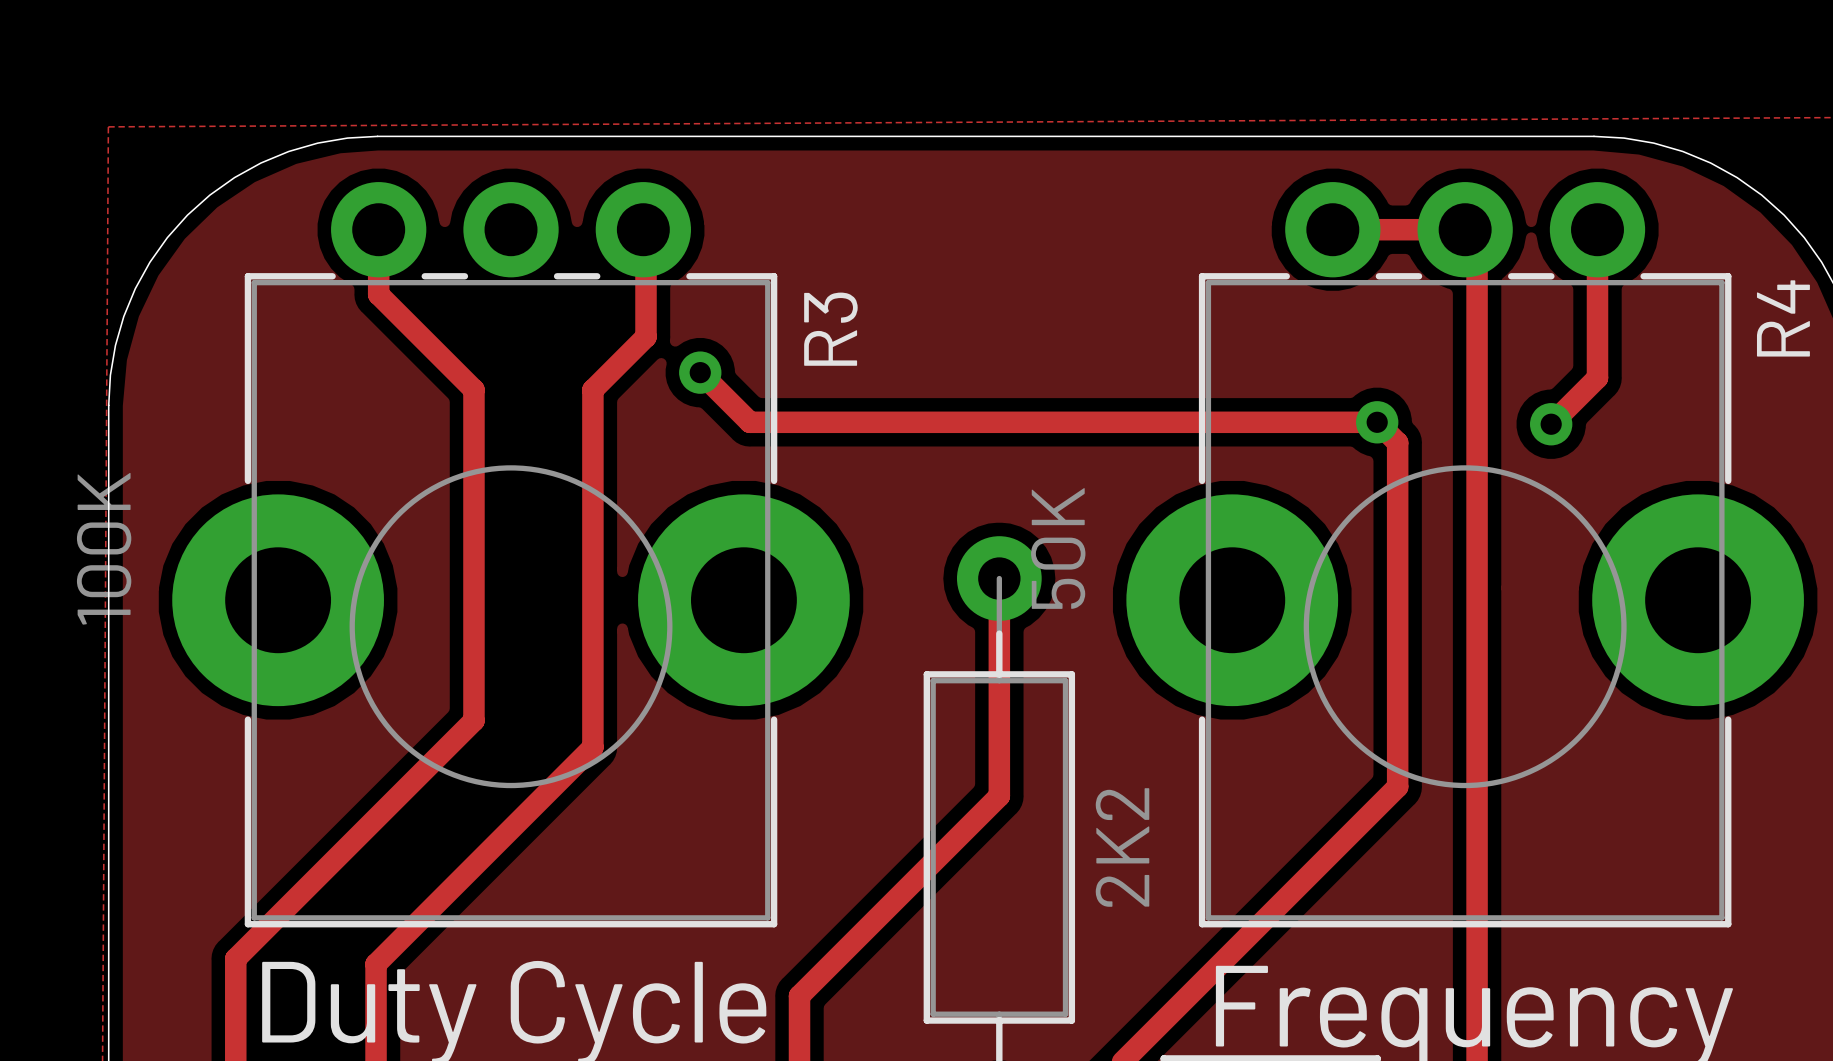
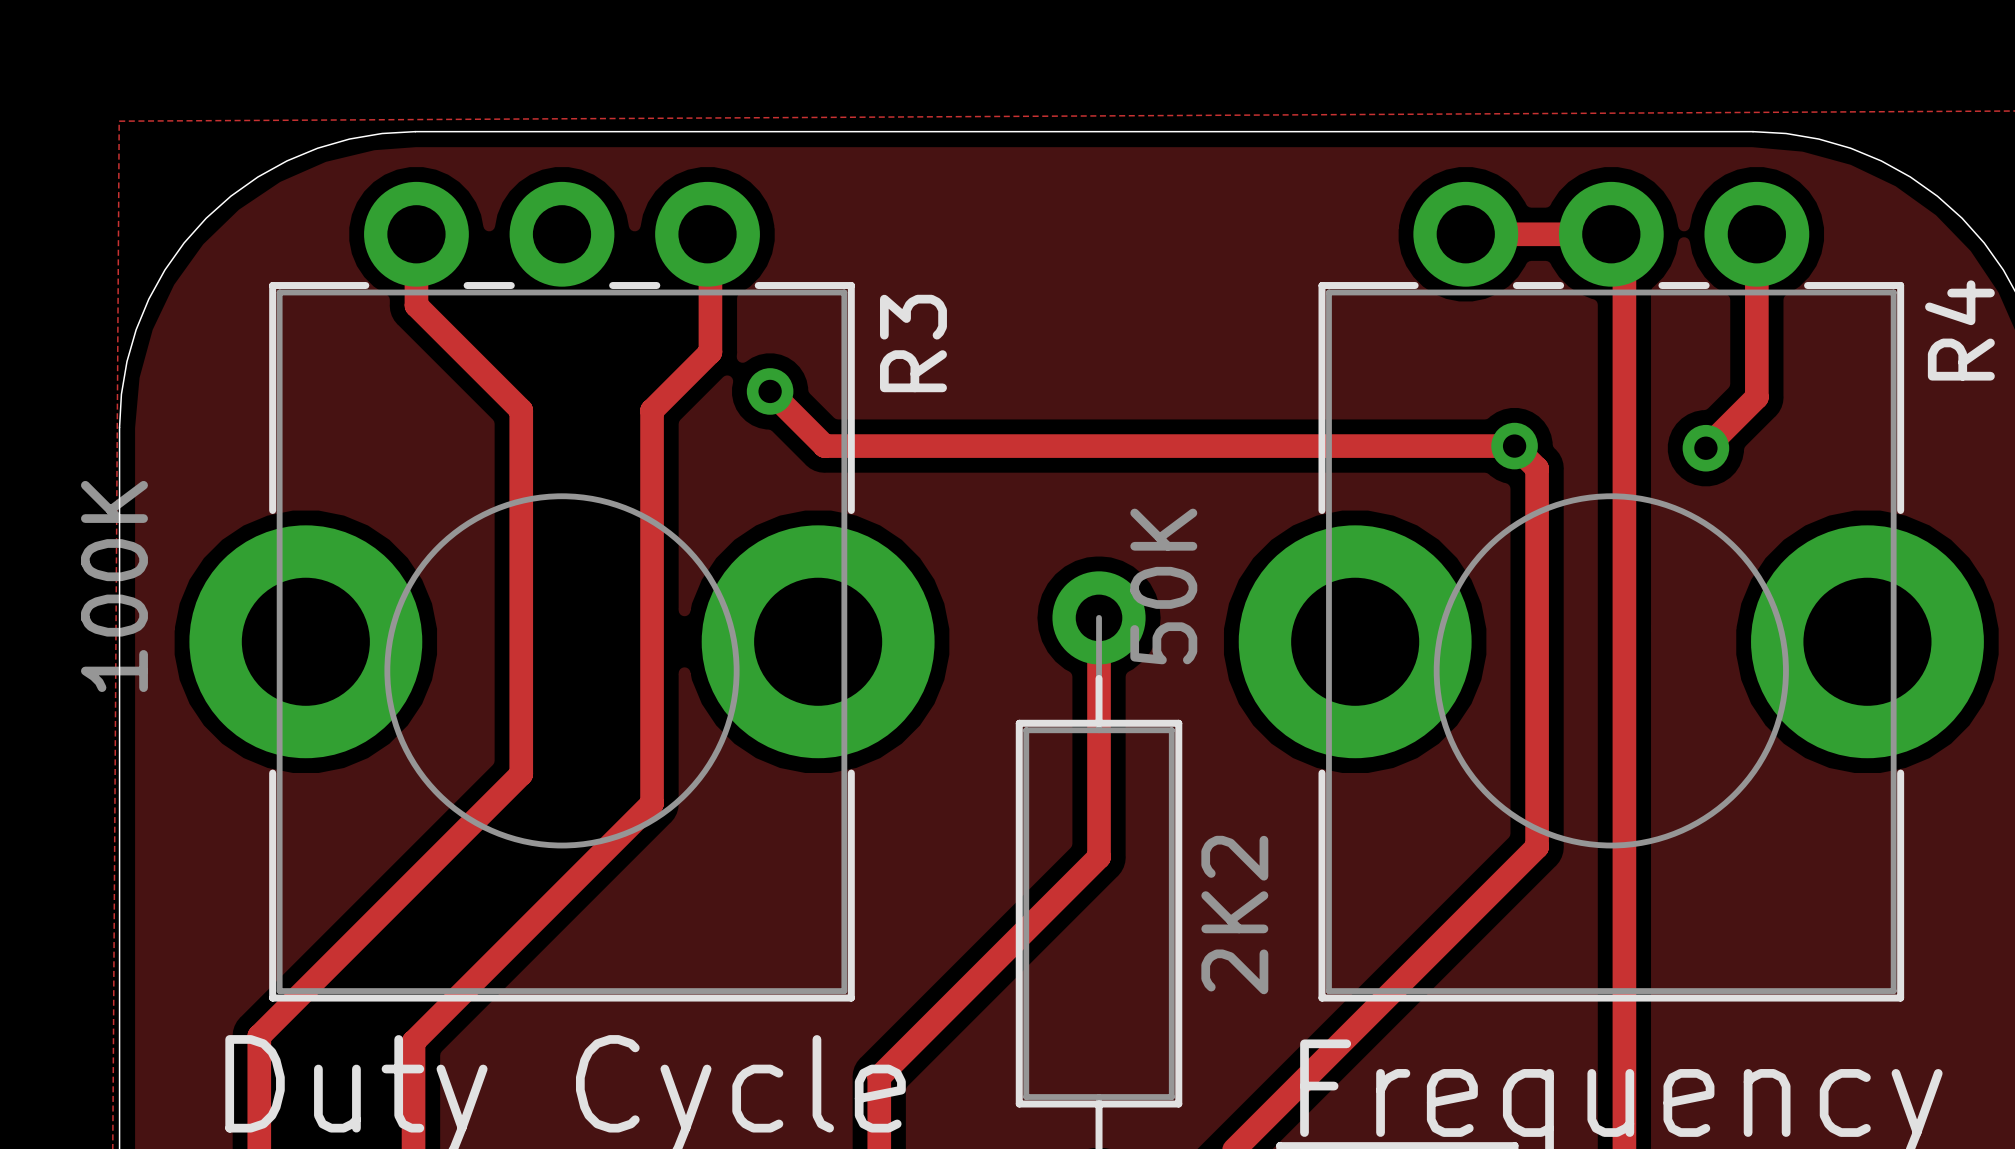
R3 footprint: [172, 182, 850, 928] -> [189, 181, 935, 1002]
R4 footprint: [1126, 182, 1804, 928] -> [1238, 181, 1984, 1002]

